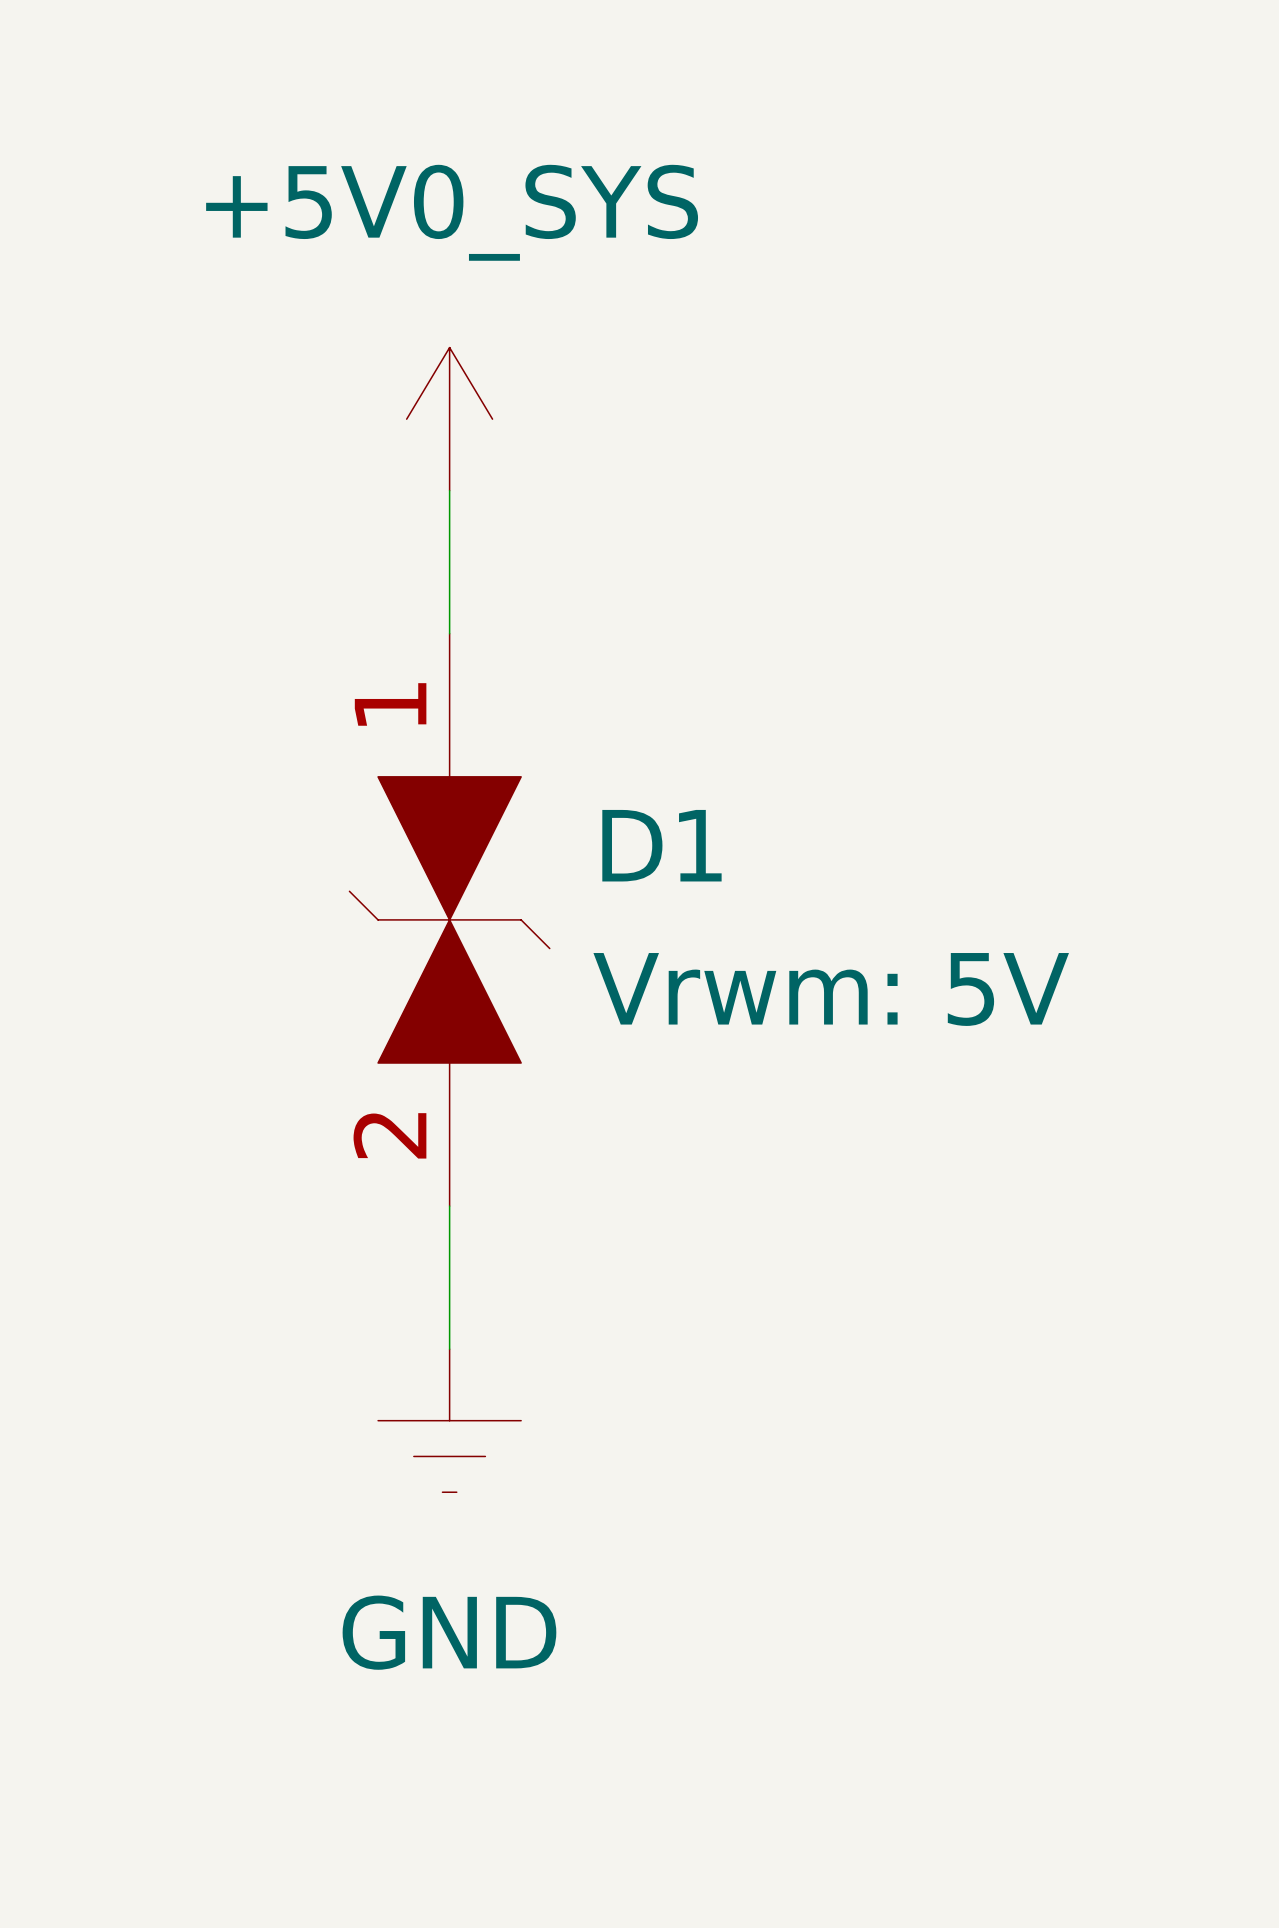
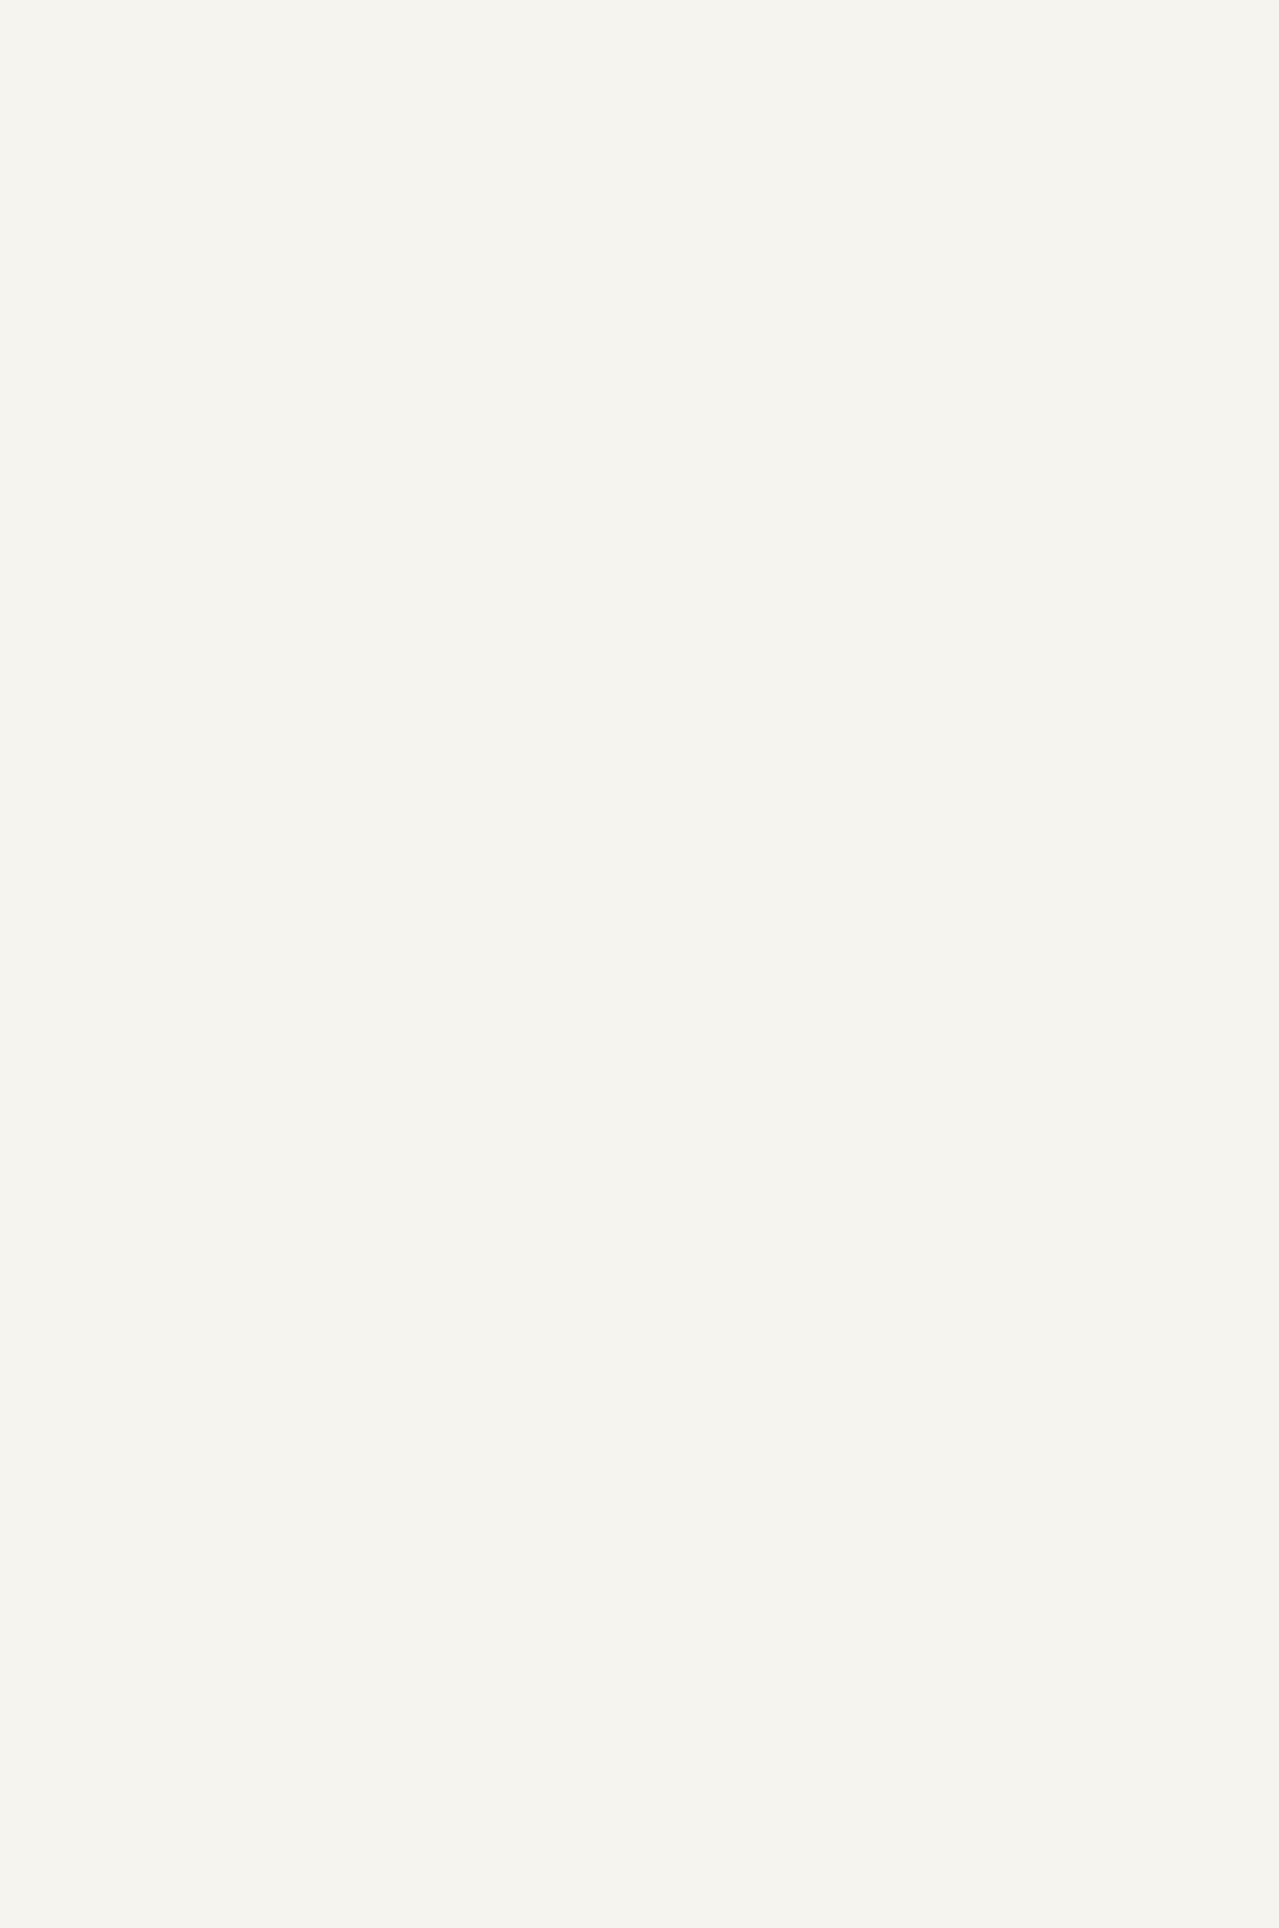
power symbol: +5V0_SYS (449, 419) -> none
wire: (449, 490) (449, 633) -> none
D1: (449, 919) -> none
wire: (449, 1206) (449, 1349) -> none
power symbol: GND (449, 1420) -> none

